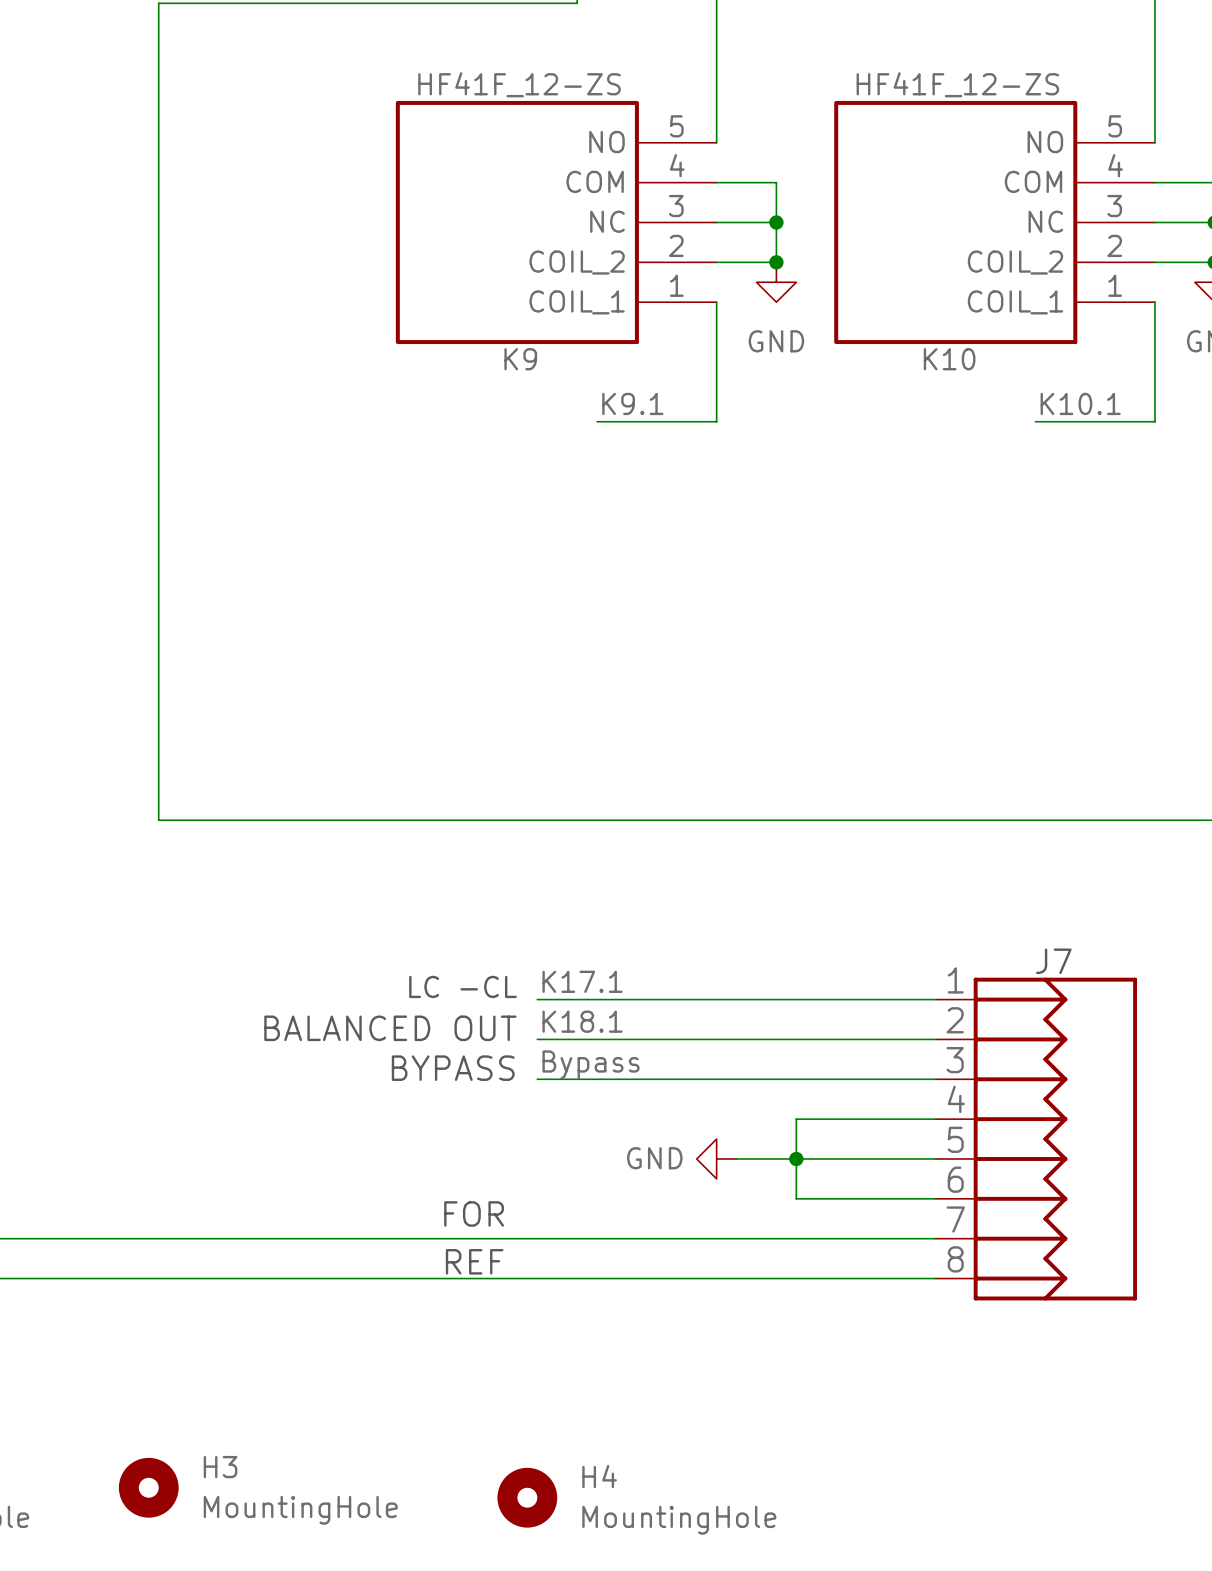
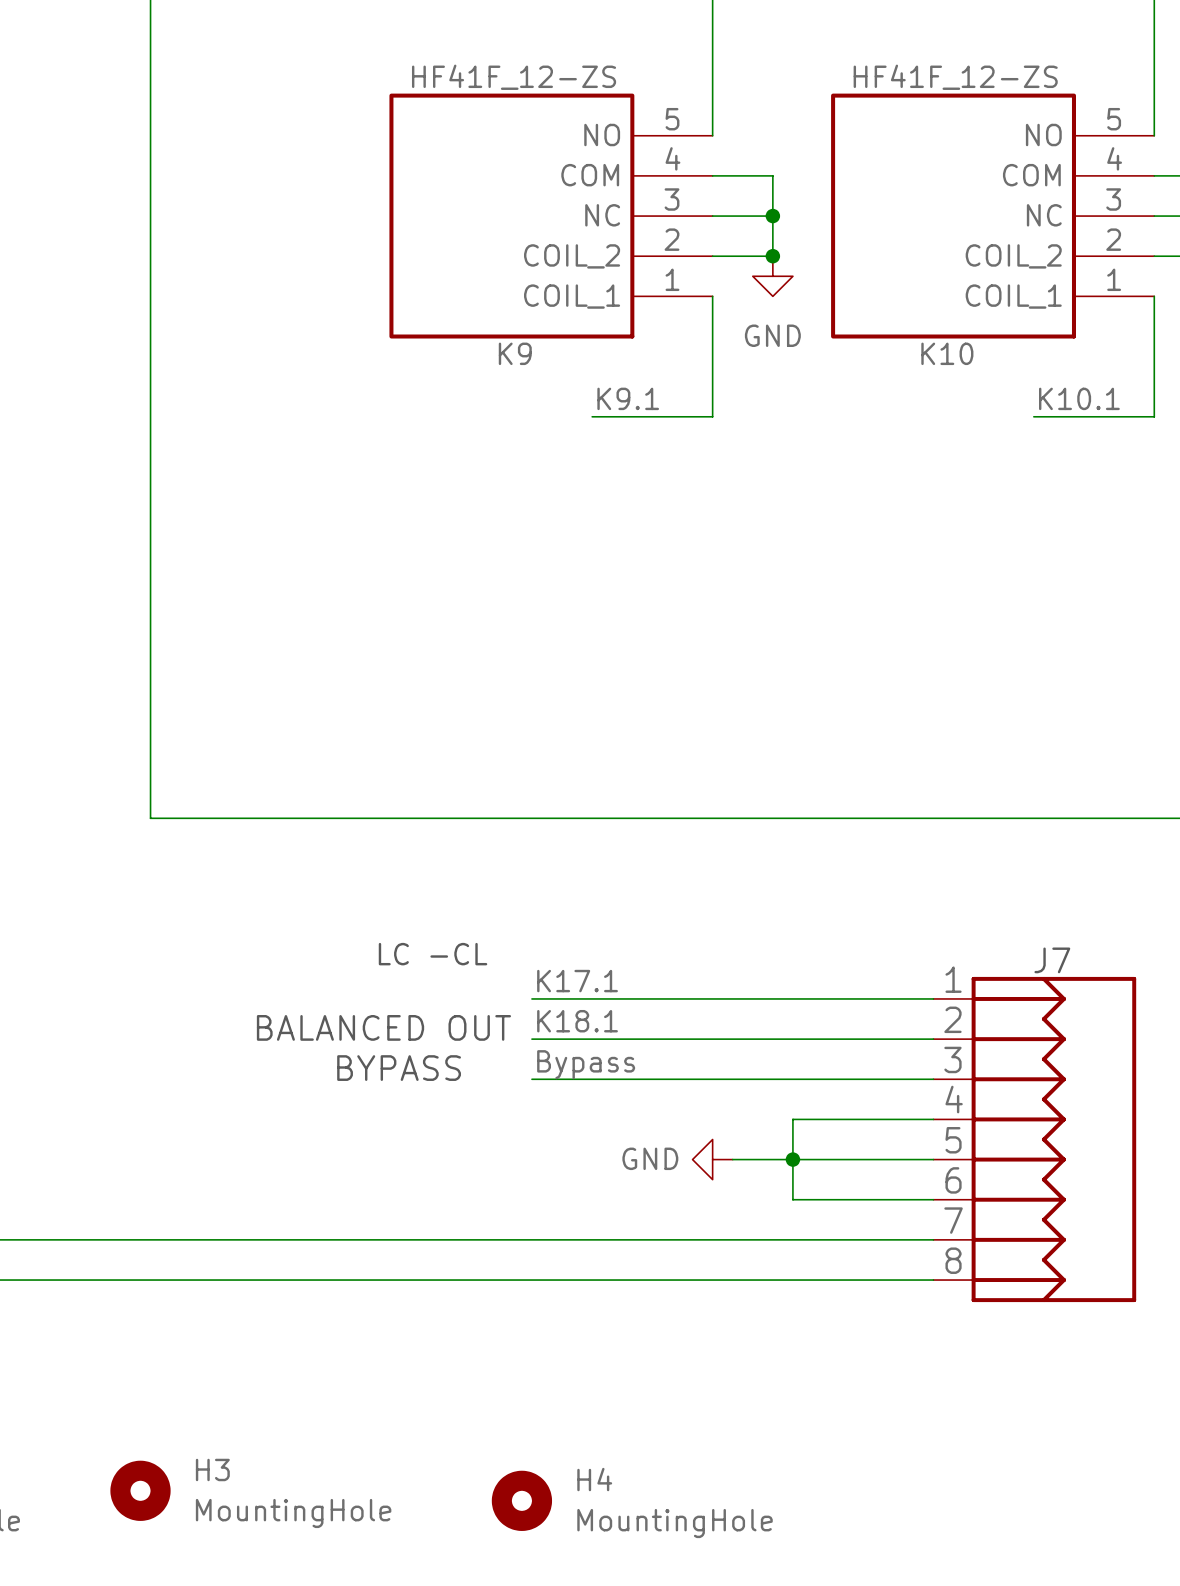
text position: LC -CL (463, 986) -> LC -CL (433, 954)
text position: BYPASS (453, 1068) -> BYPASS (399, 1068)
text: FOR (474, 1213) -> none
text: REF (474, 1261) -> none

